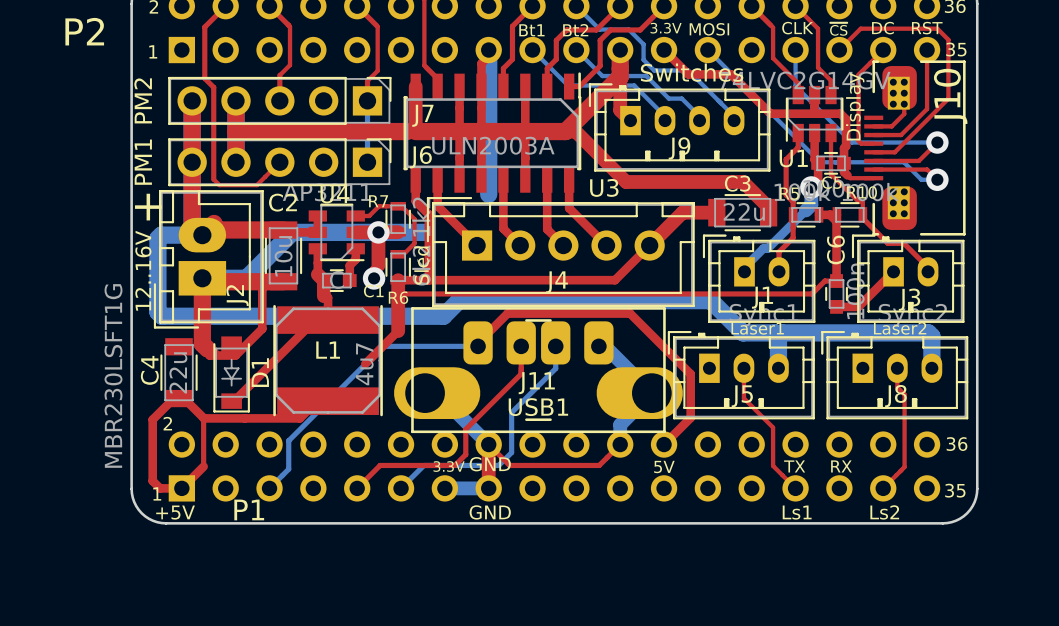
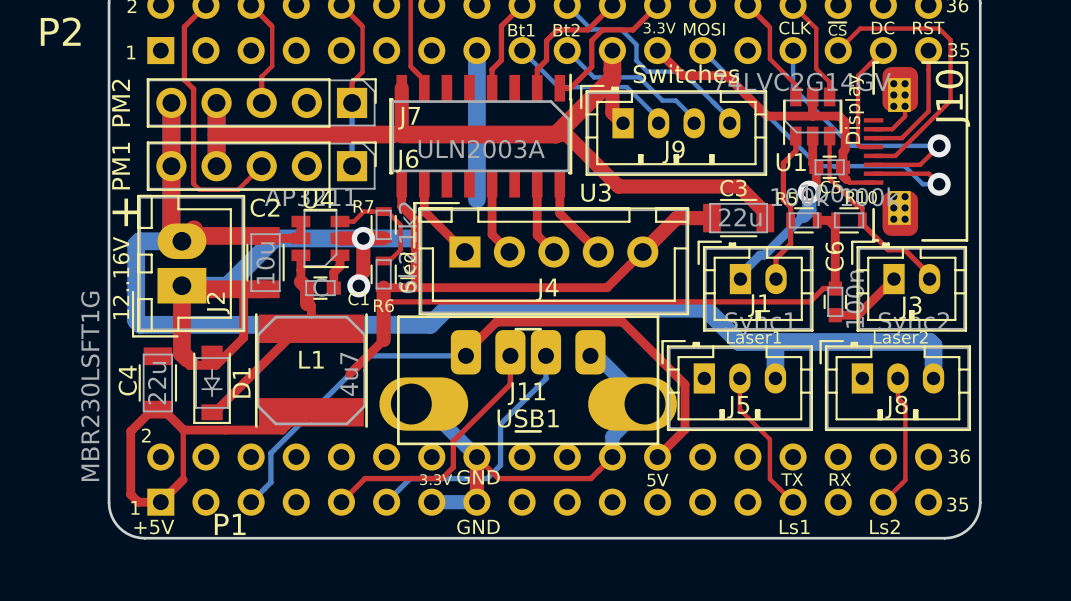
top track: (488, 50) (488, 56) (481, 63) (481, 179) -> none
top track: (459, 86) (459, 179) -> none
top track: (525, 86) (525, 179) -> none

